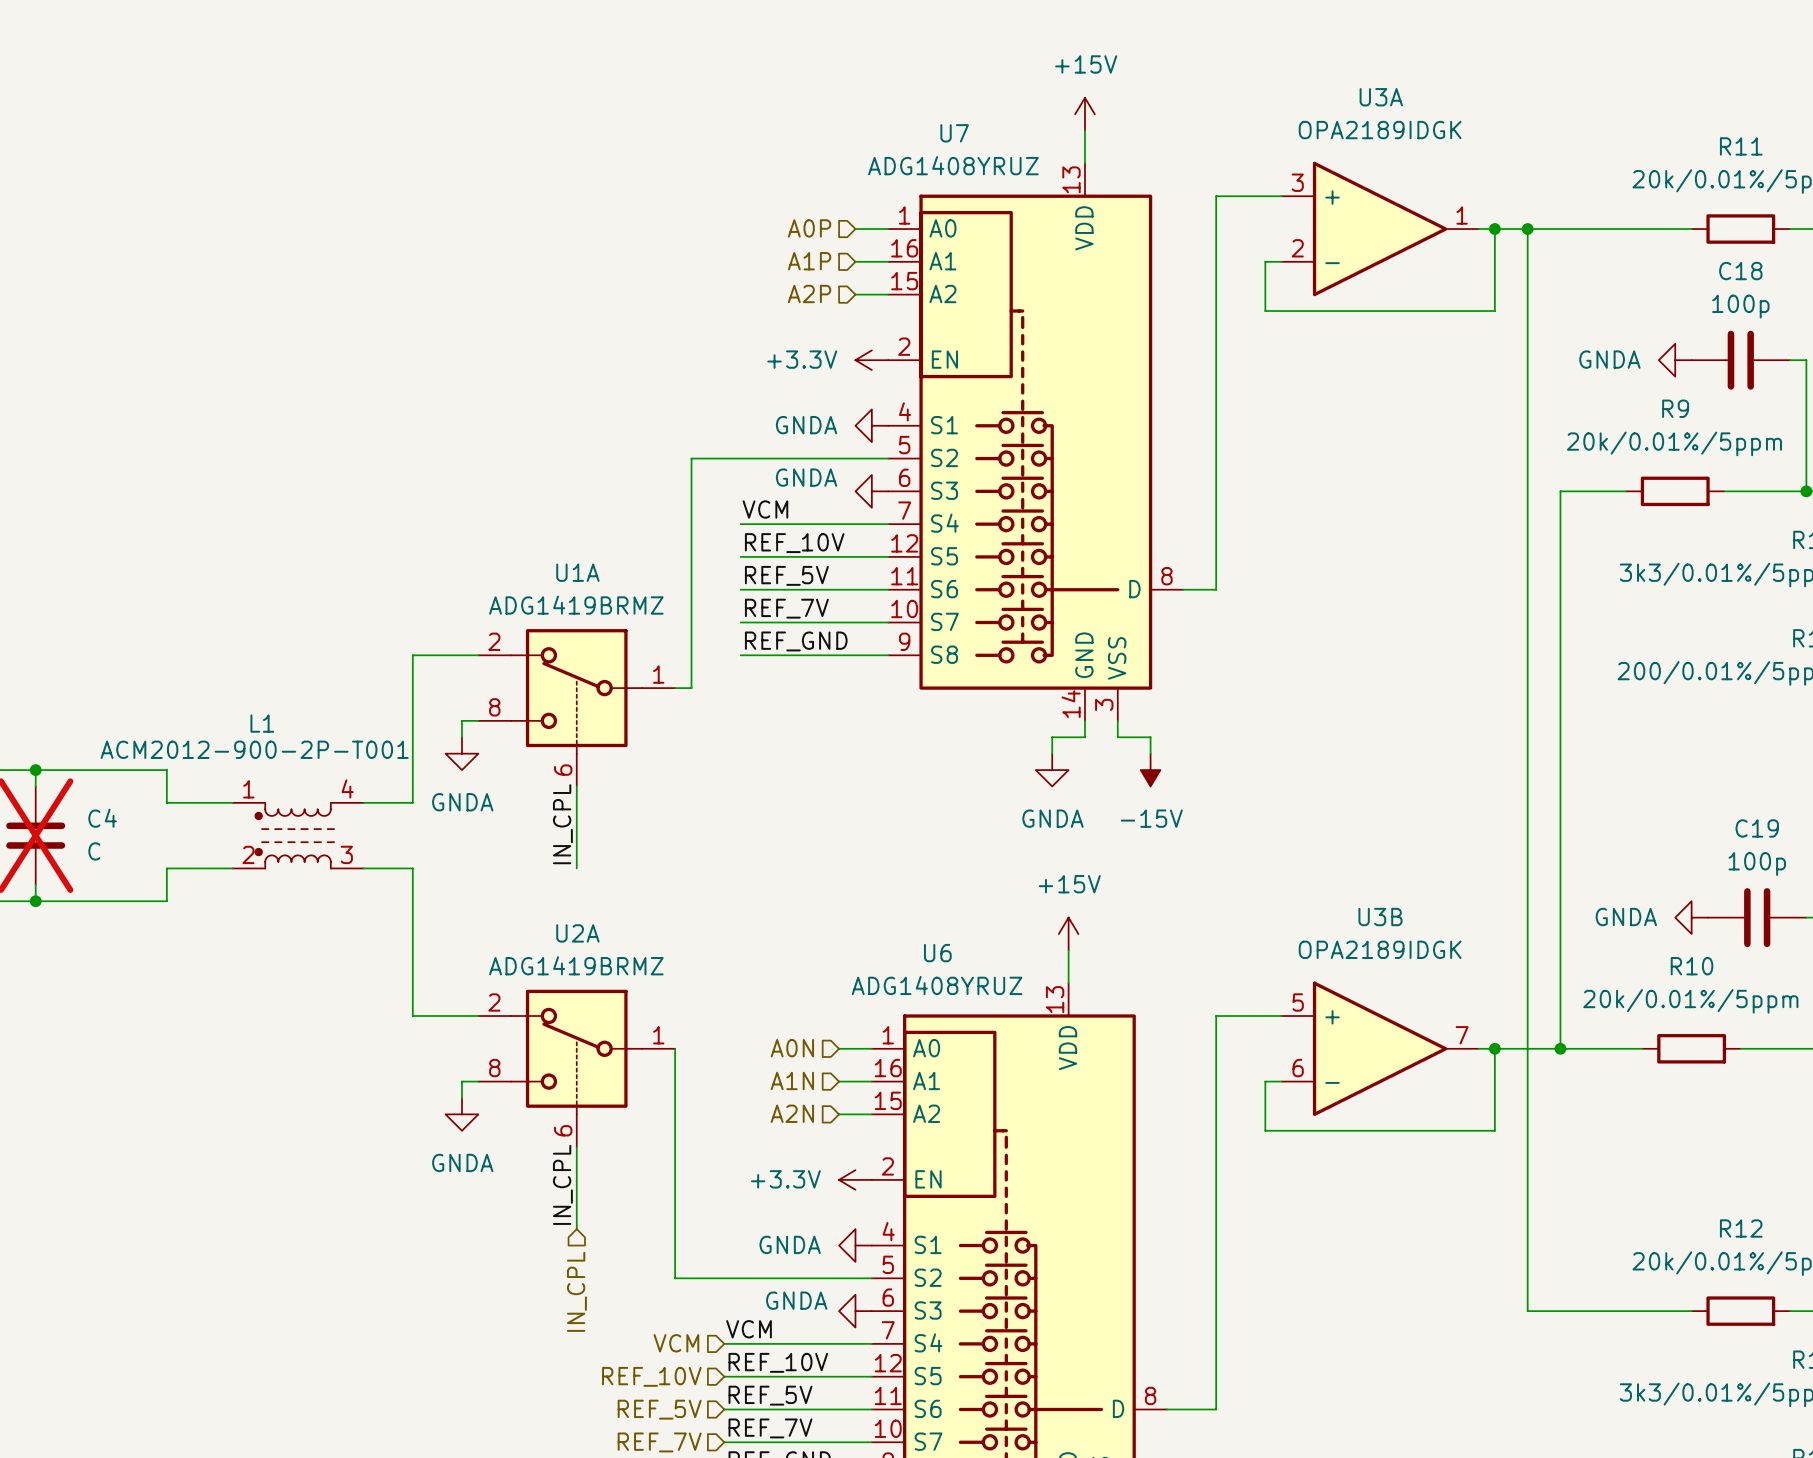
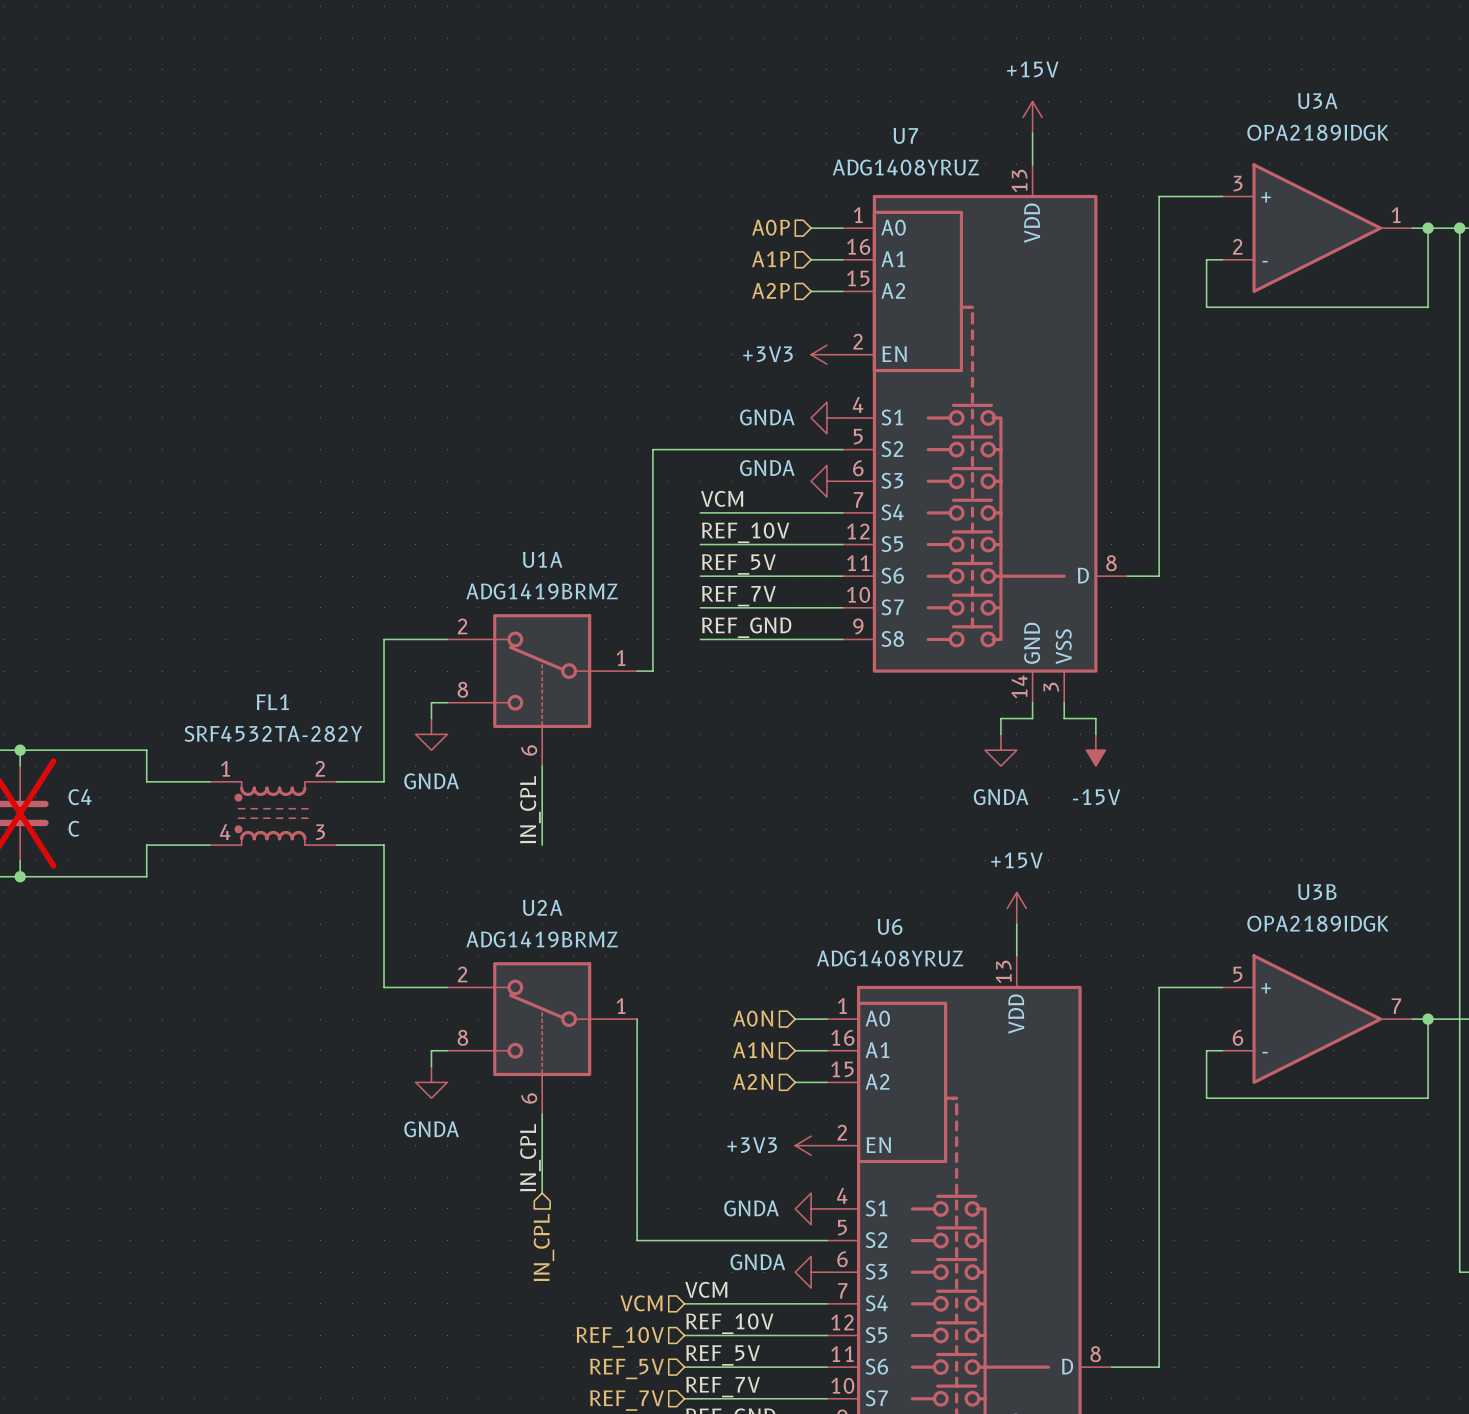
power symbol: +3.3V (871, 360) -> +3V3 (826, 354)
L1: ACM2012-900-2P-T001 (298, 835) -> none
FL1: none -> SRF4532TA-282Y (273, 813)
power symbol: +3.3V (855, 1179) -> +3V3 (811, 1145)

